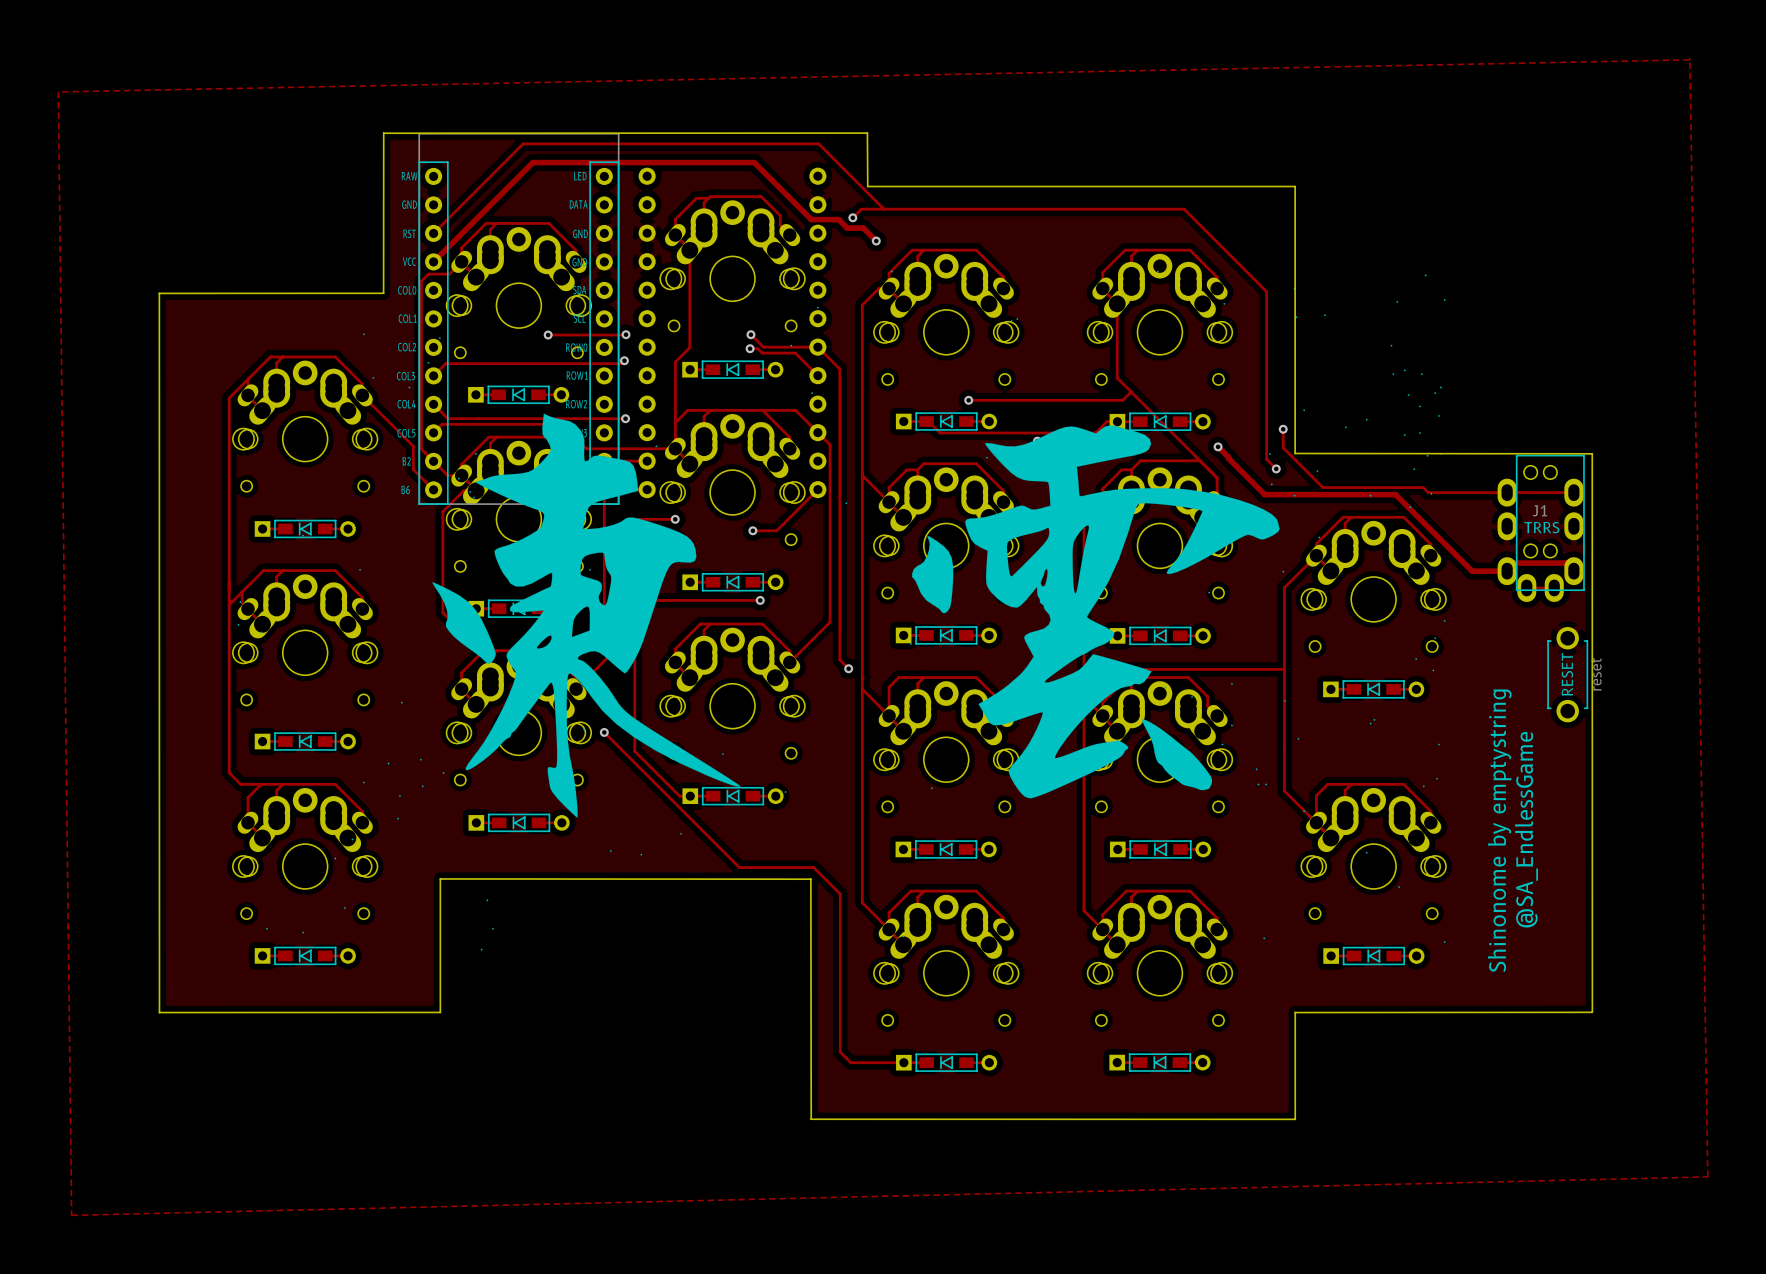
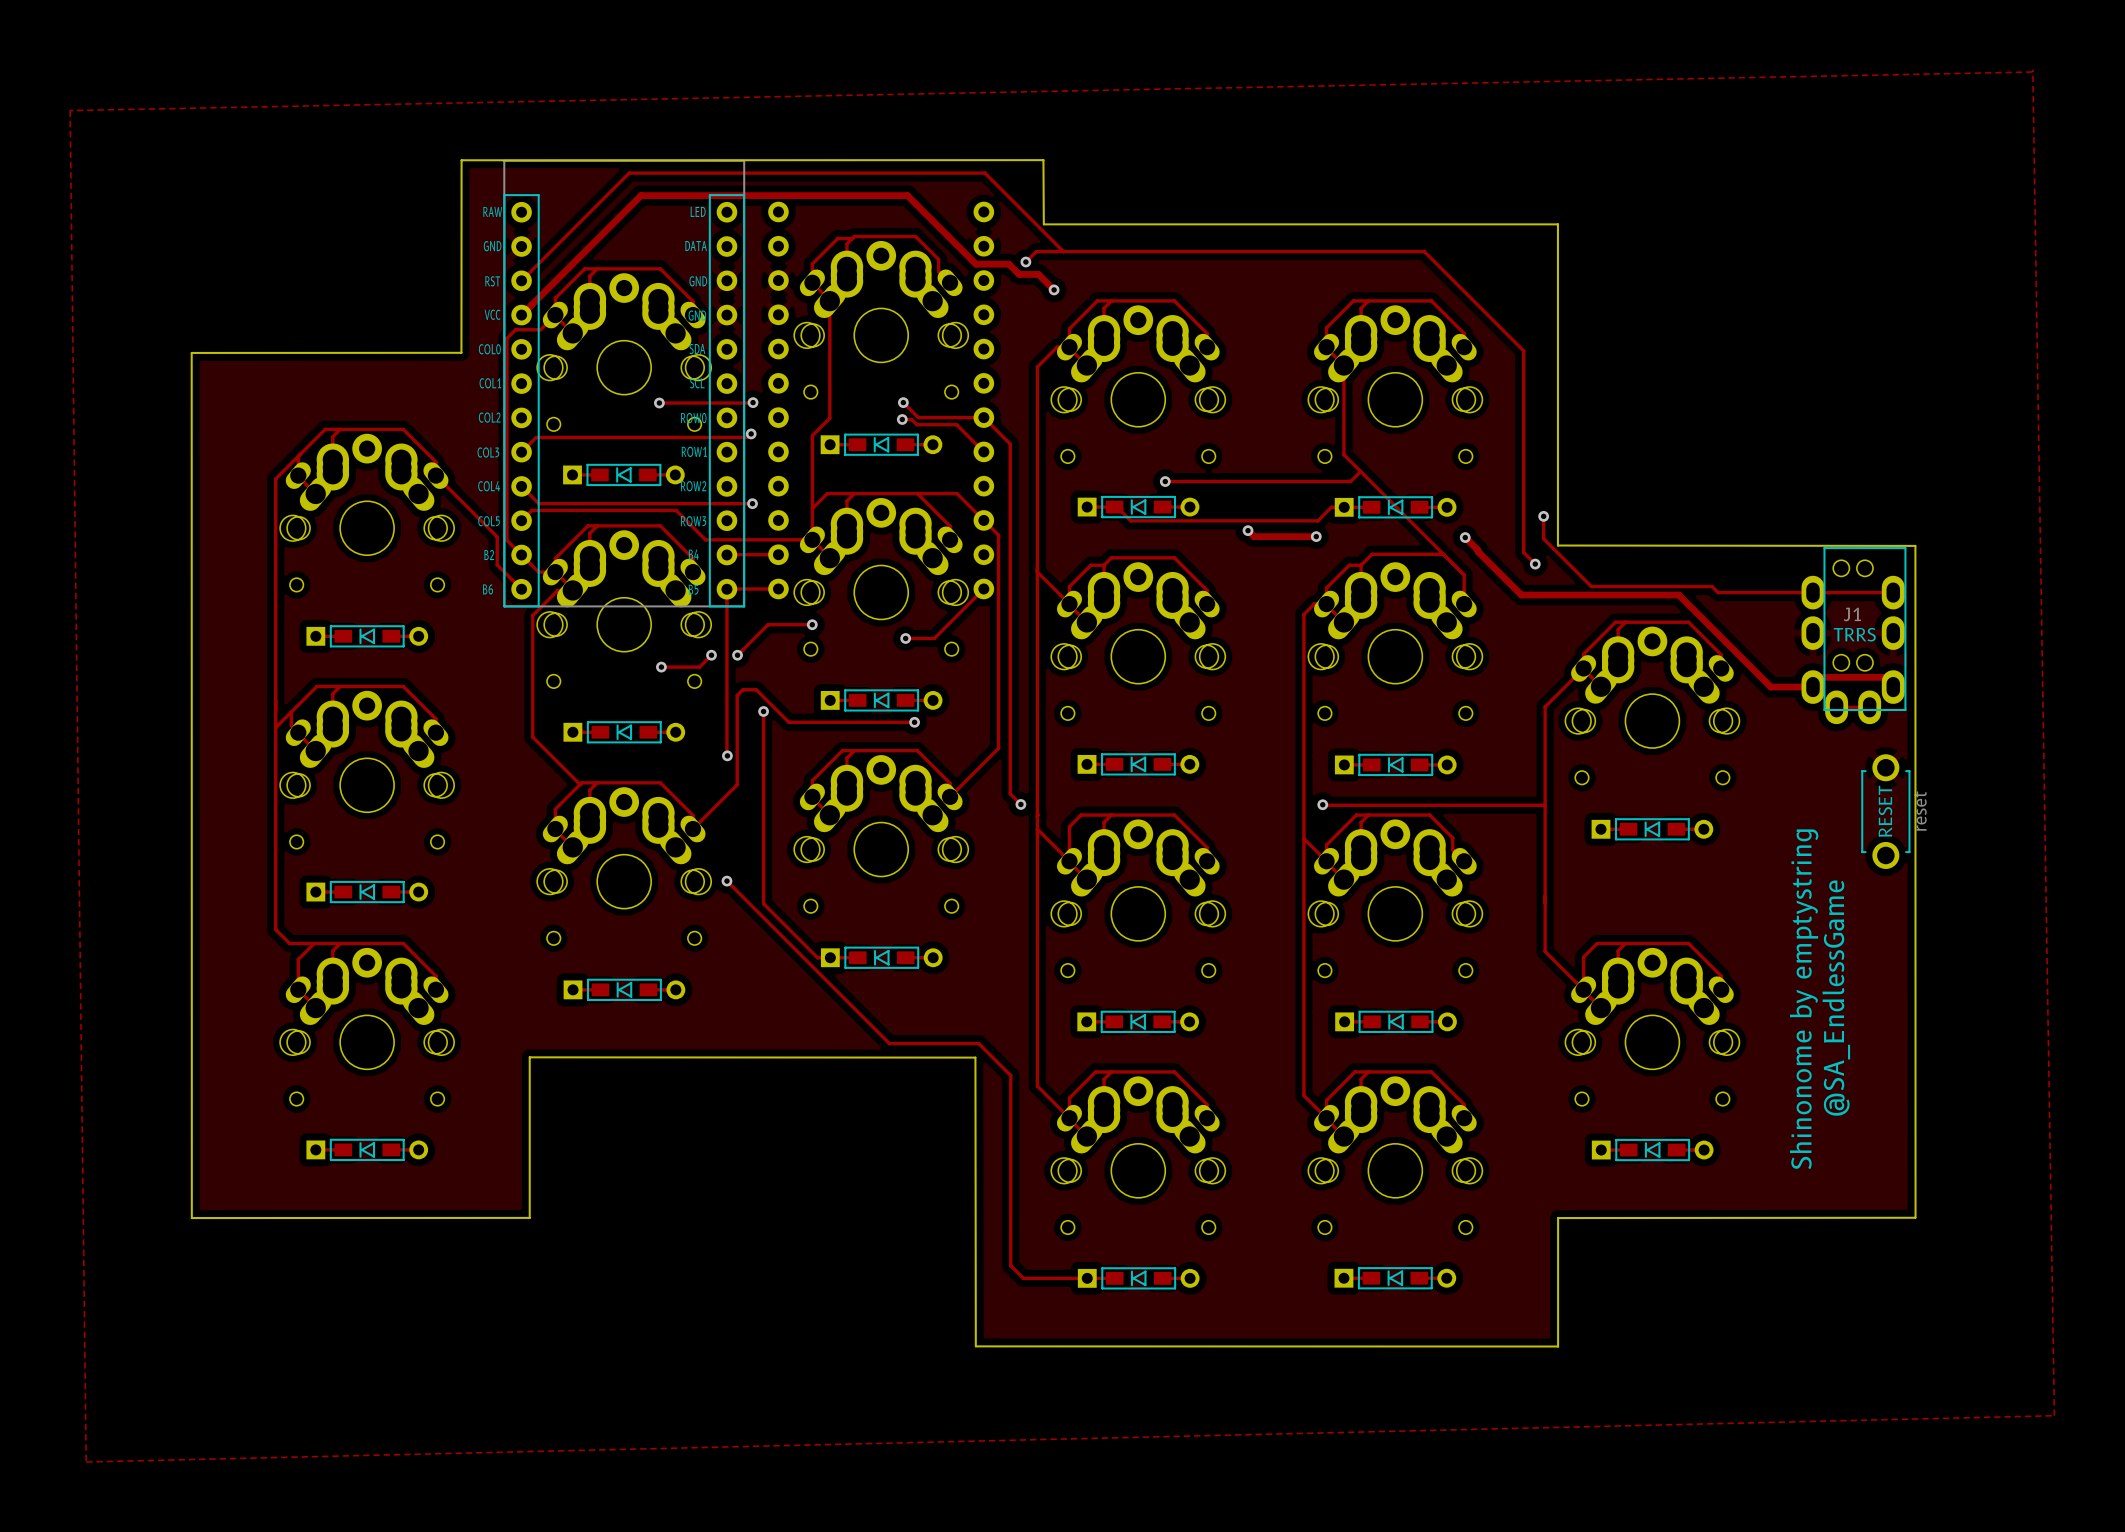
drawing: [237, 270, 1446, 951] -> none

